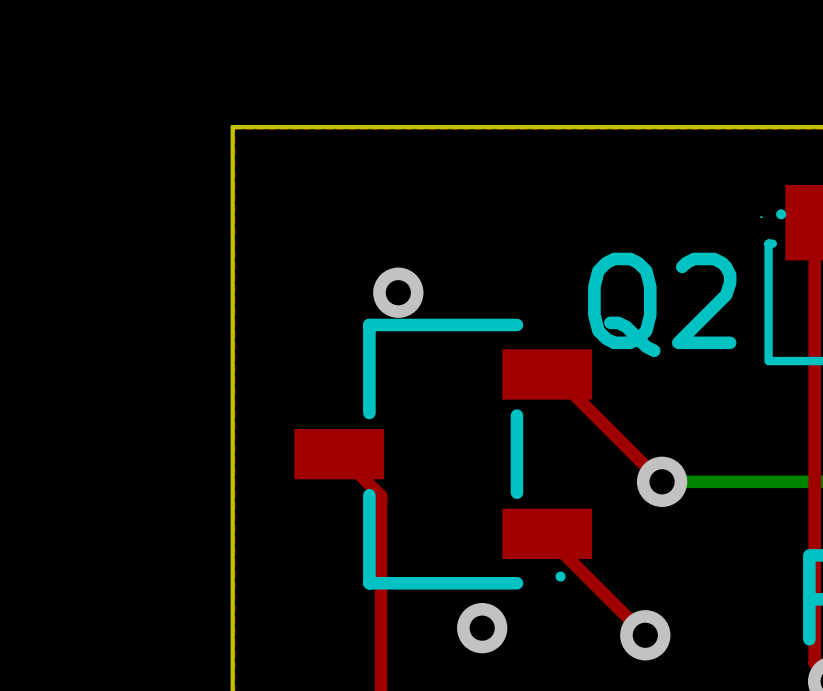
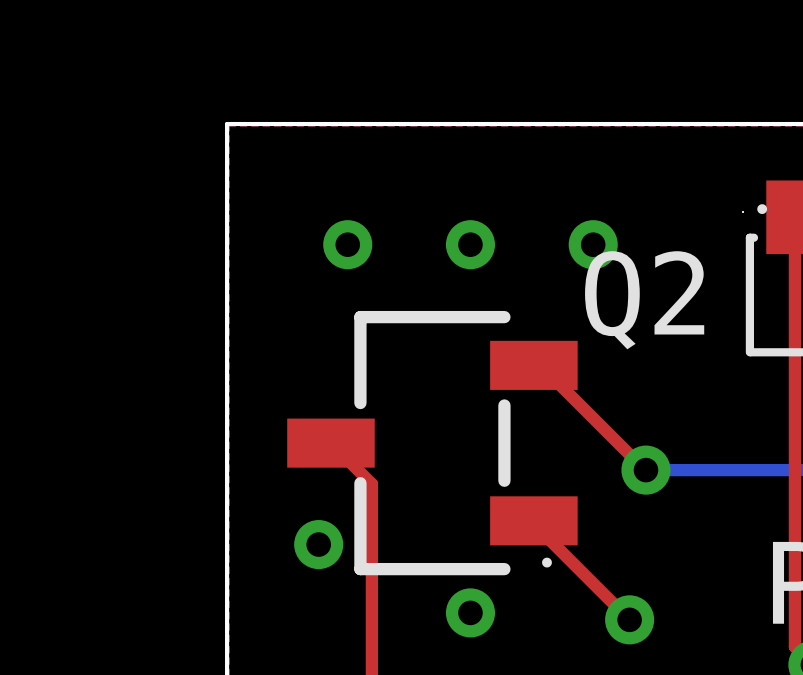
via: none -> (470, 244)
via: none -> (593, 244)
via position: (398, 292) -> (347, 244)
via: none -> (318, 544)

